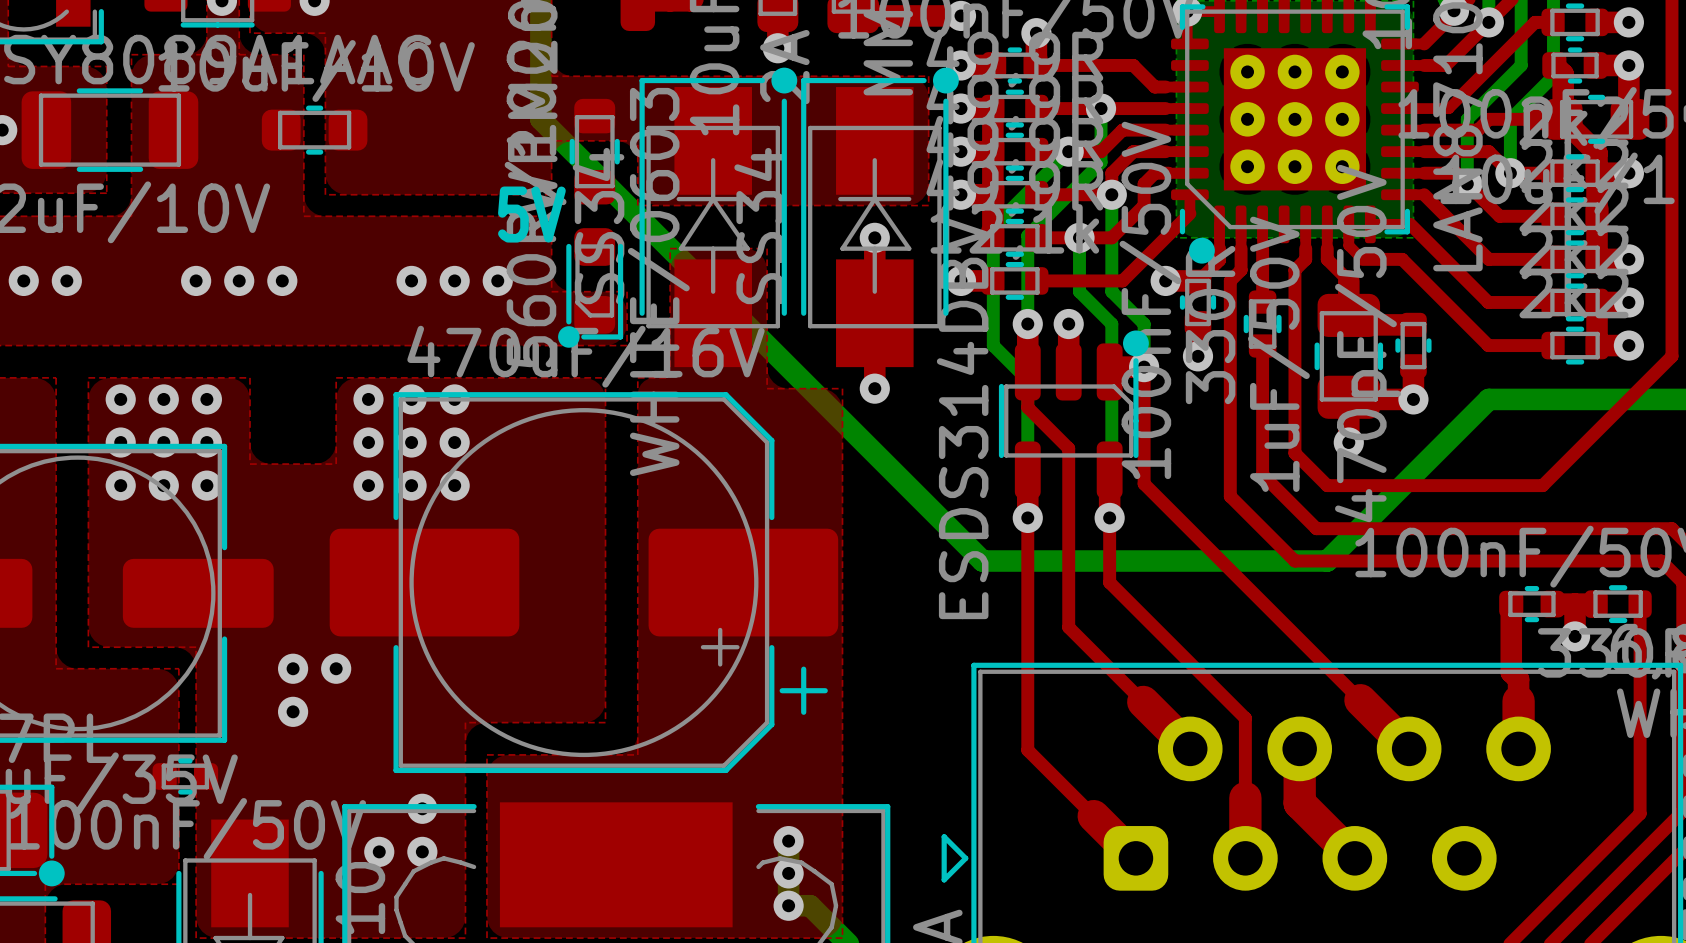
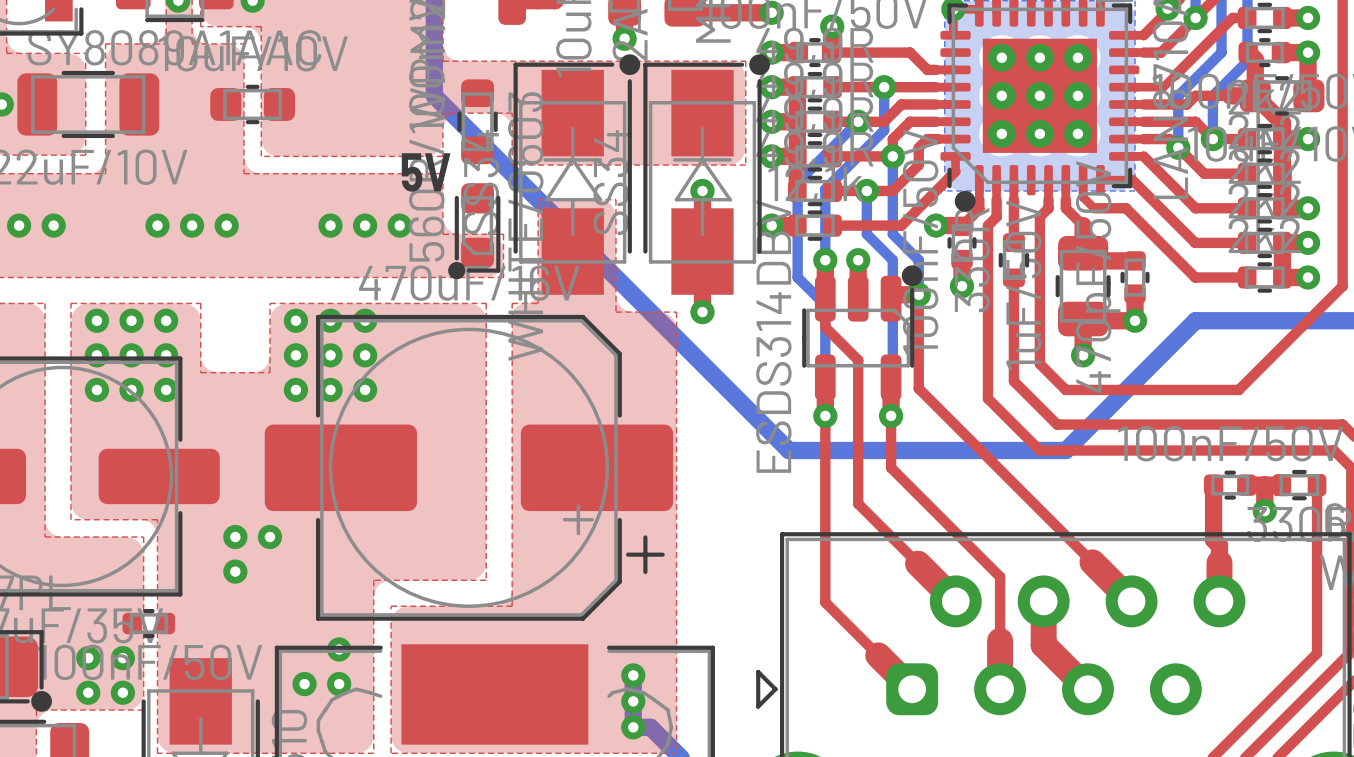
via: none -> (88, 658)
via: none -> (122, 658)
via: none -> (88, 692)
via: none -> (122, 692)

